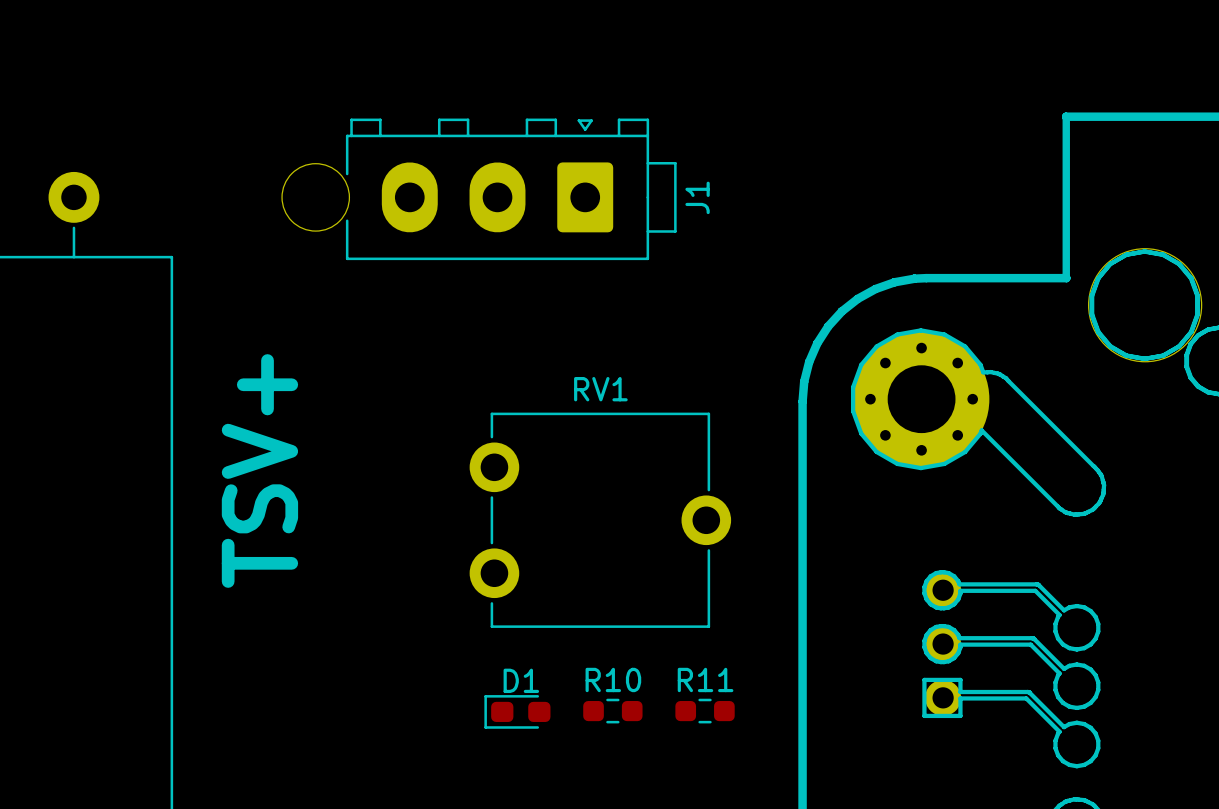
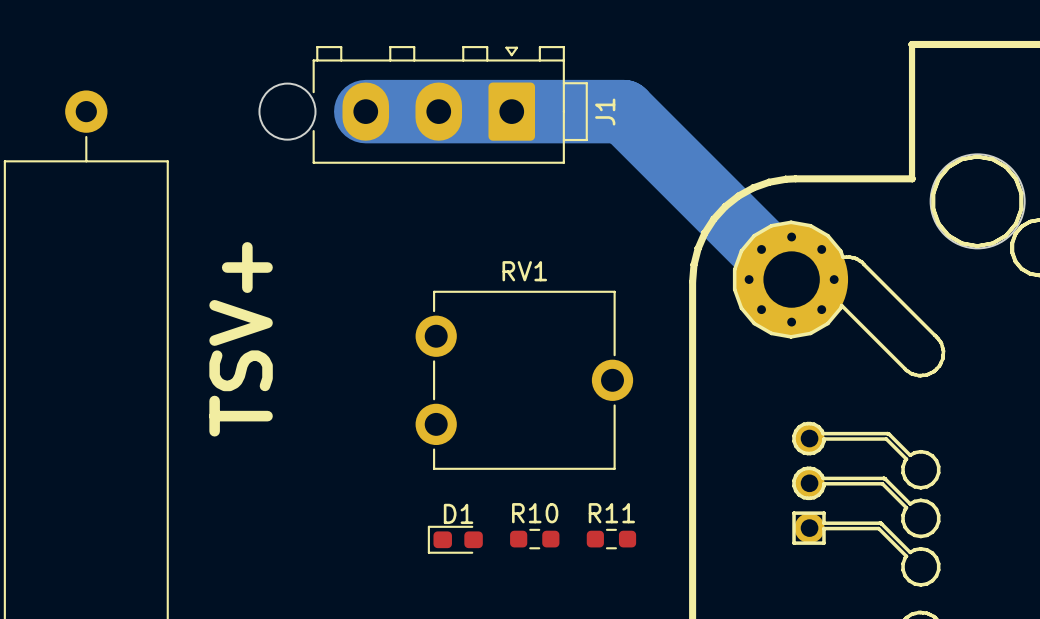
bottom track: none -> (365, 111) (623, 111) (791, 279)

